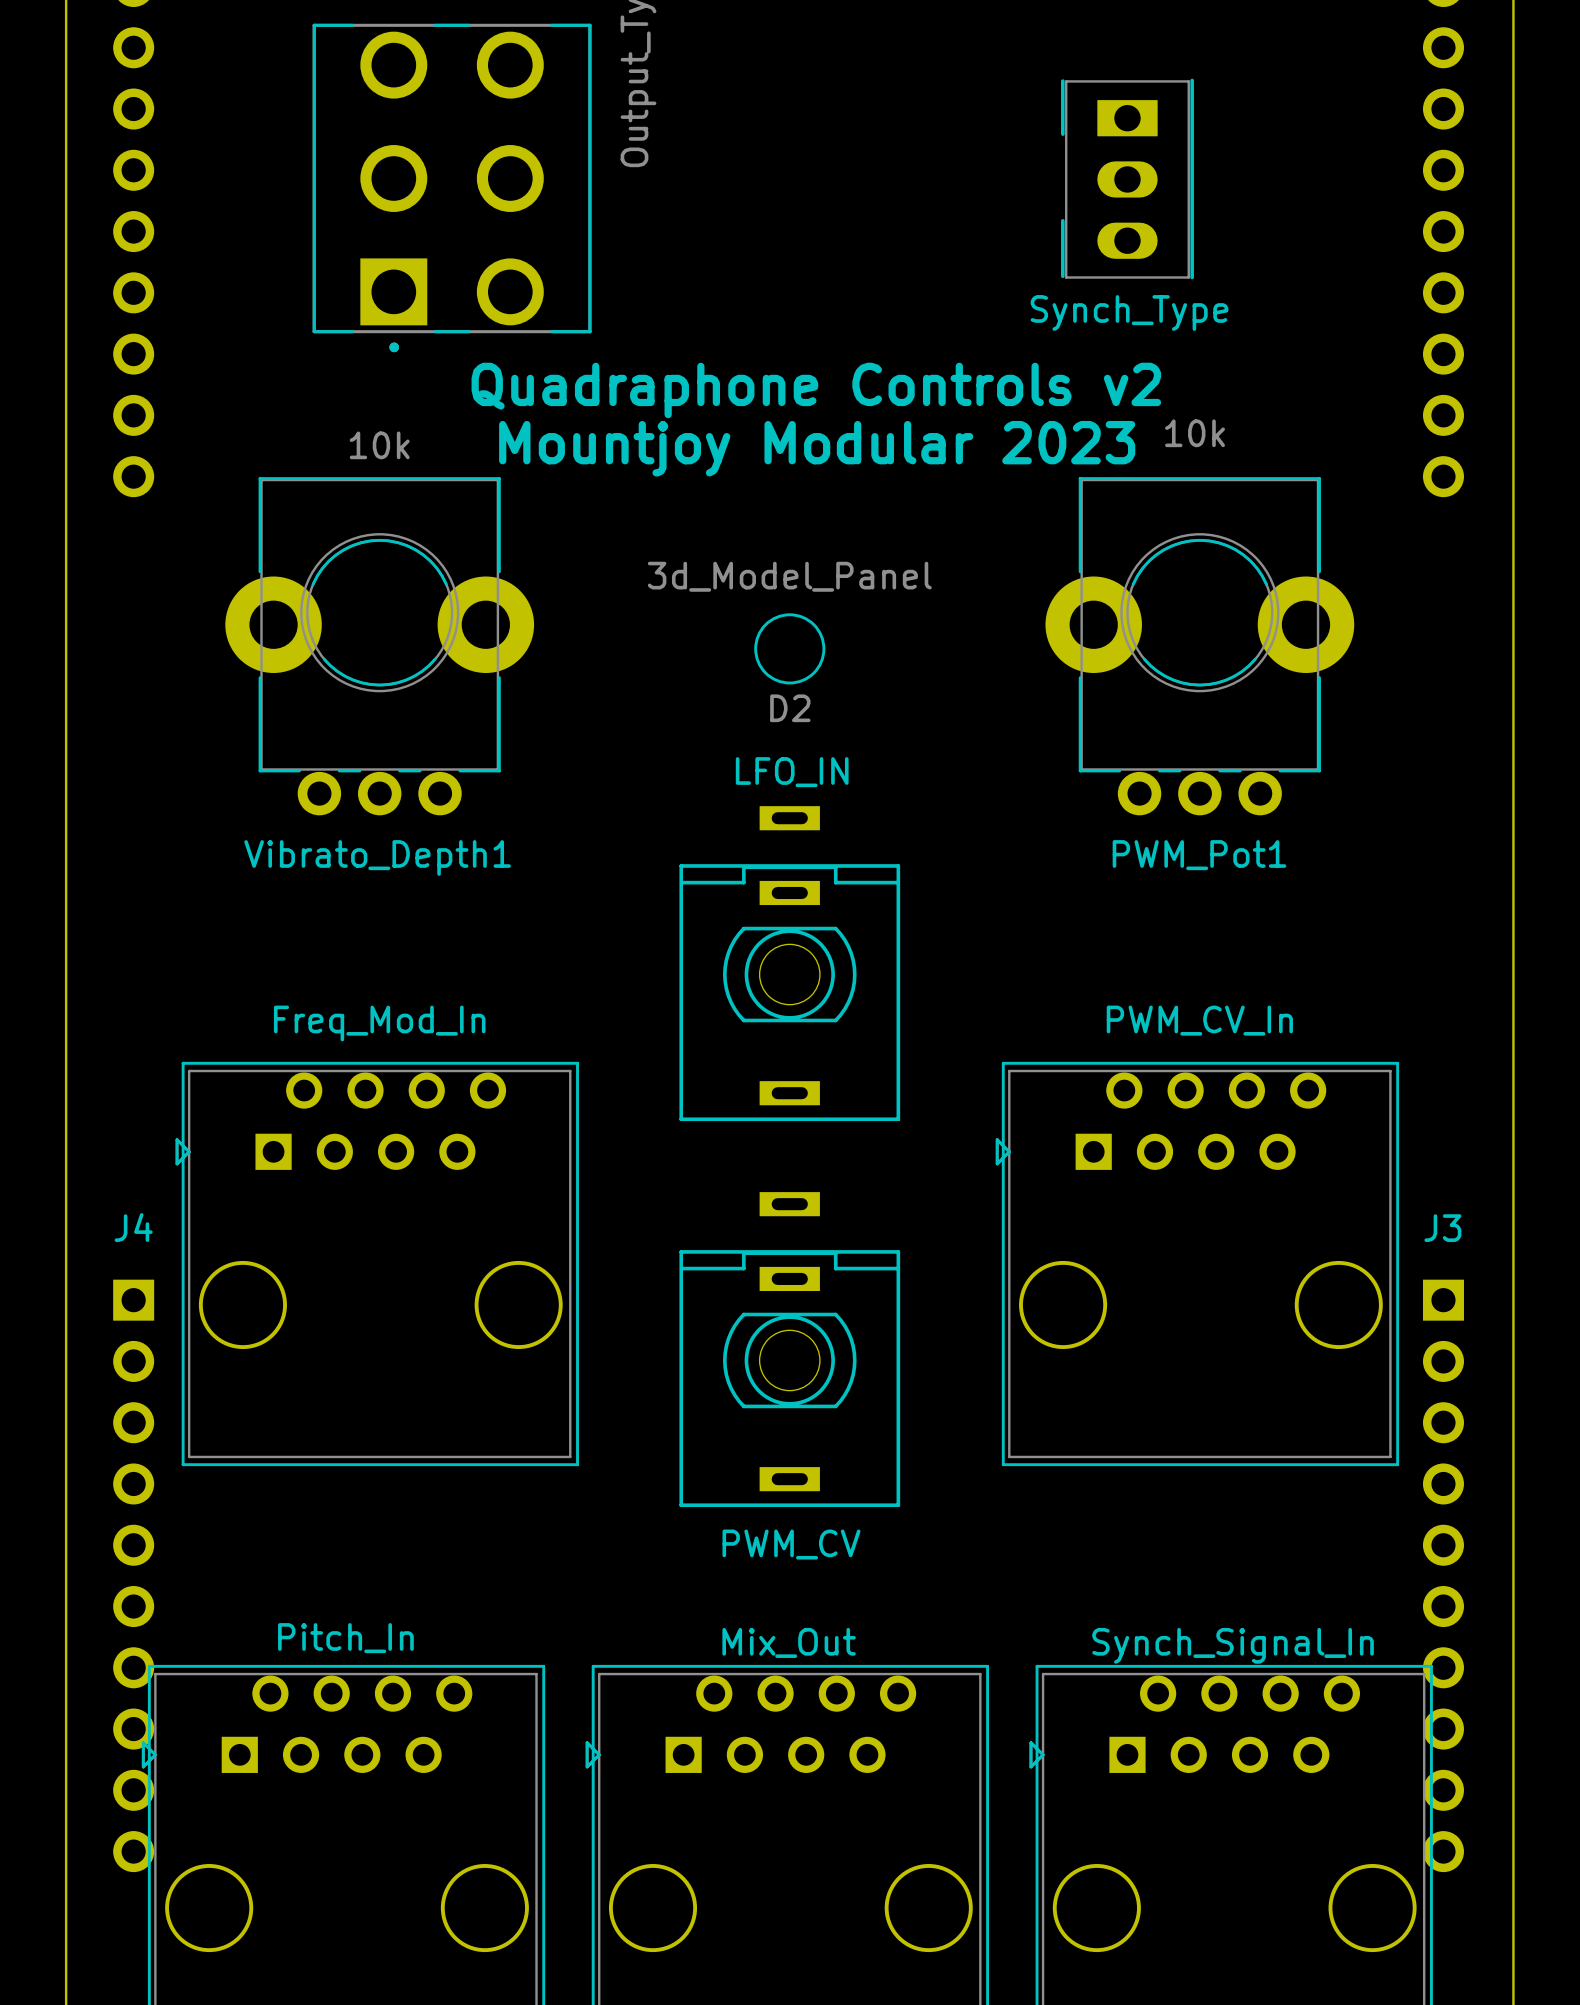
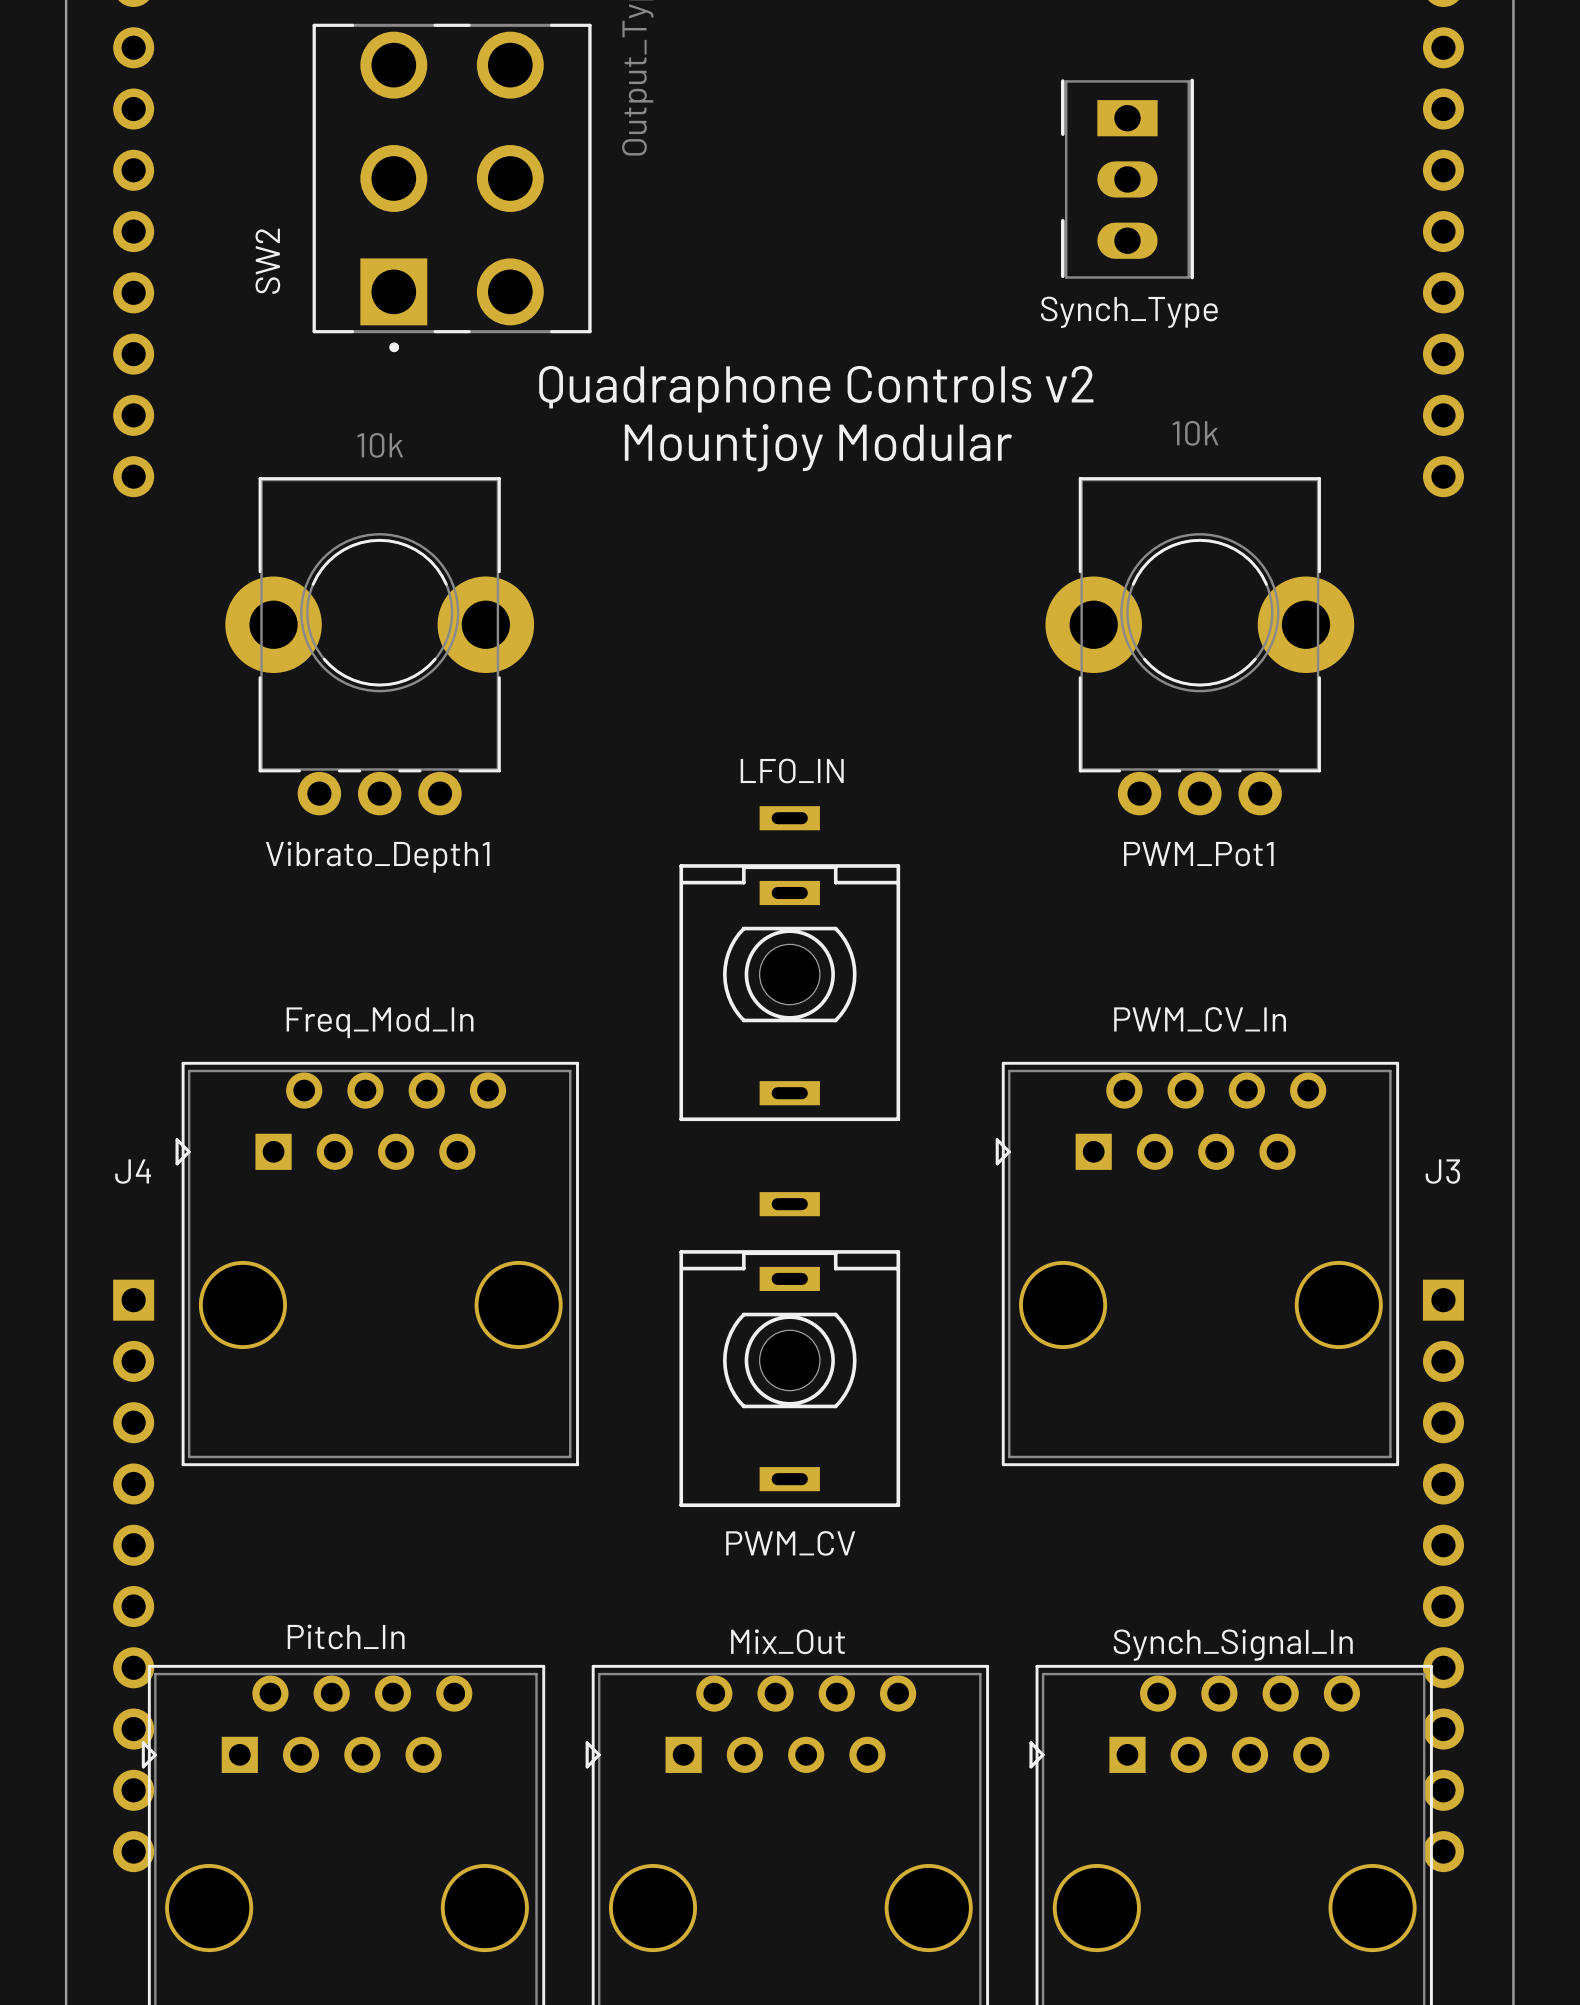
SW2 name: none -> SW2 (267, 261)
text: Mountjoy Modular 2023 (817, 448) -> Mountjoy Modular (818, 447)
D2: 3d_Model_Panel (789, 648) -> none
text position: J4 (133, 1227) -> J4 (133, 1171)
text position: J3 (1442, 1228) -> J3 (1442, 1171)

